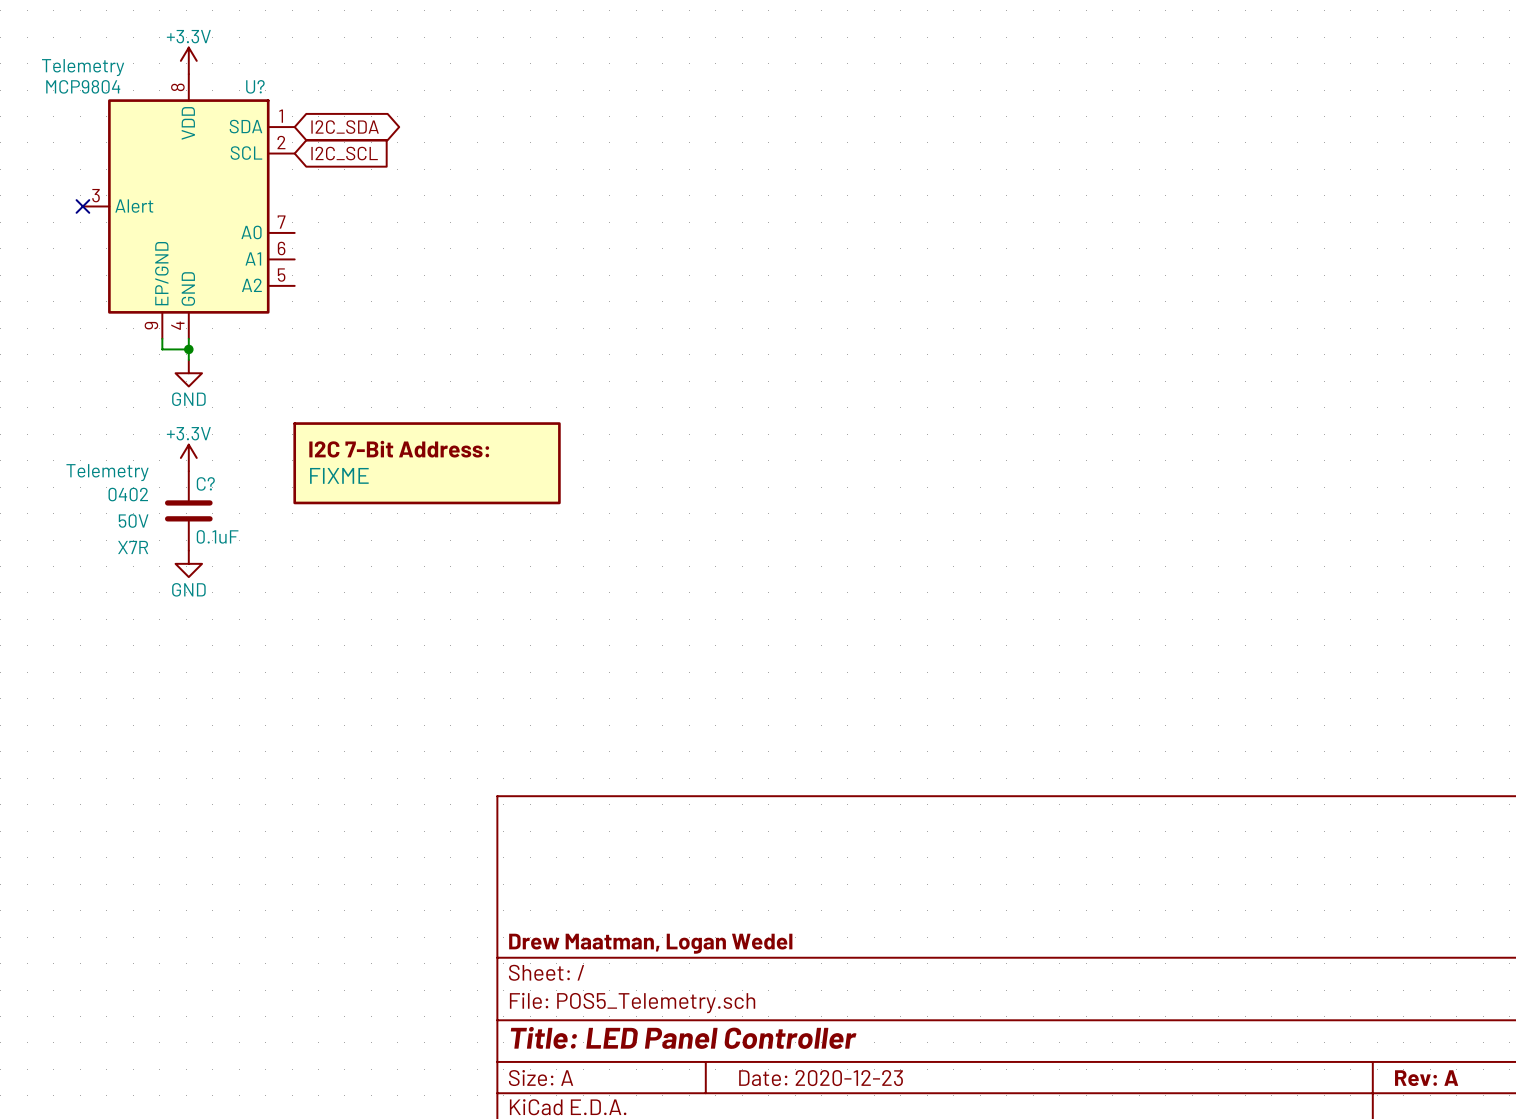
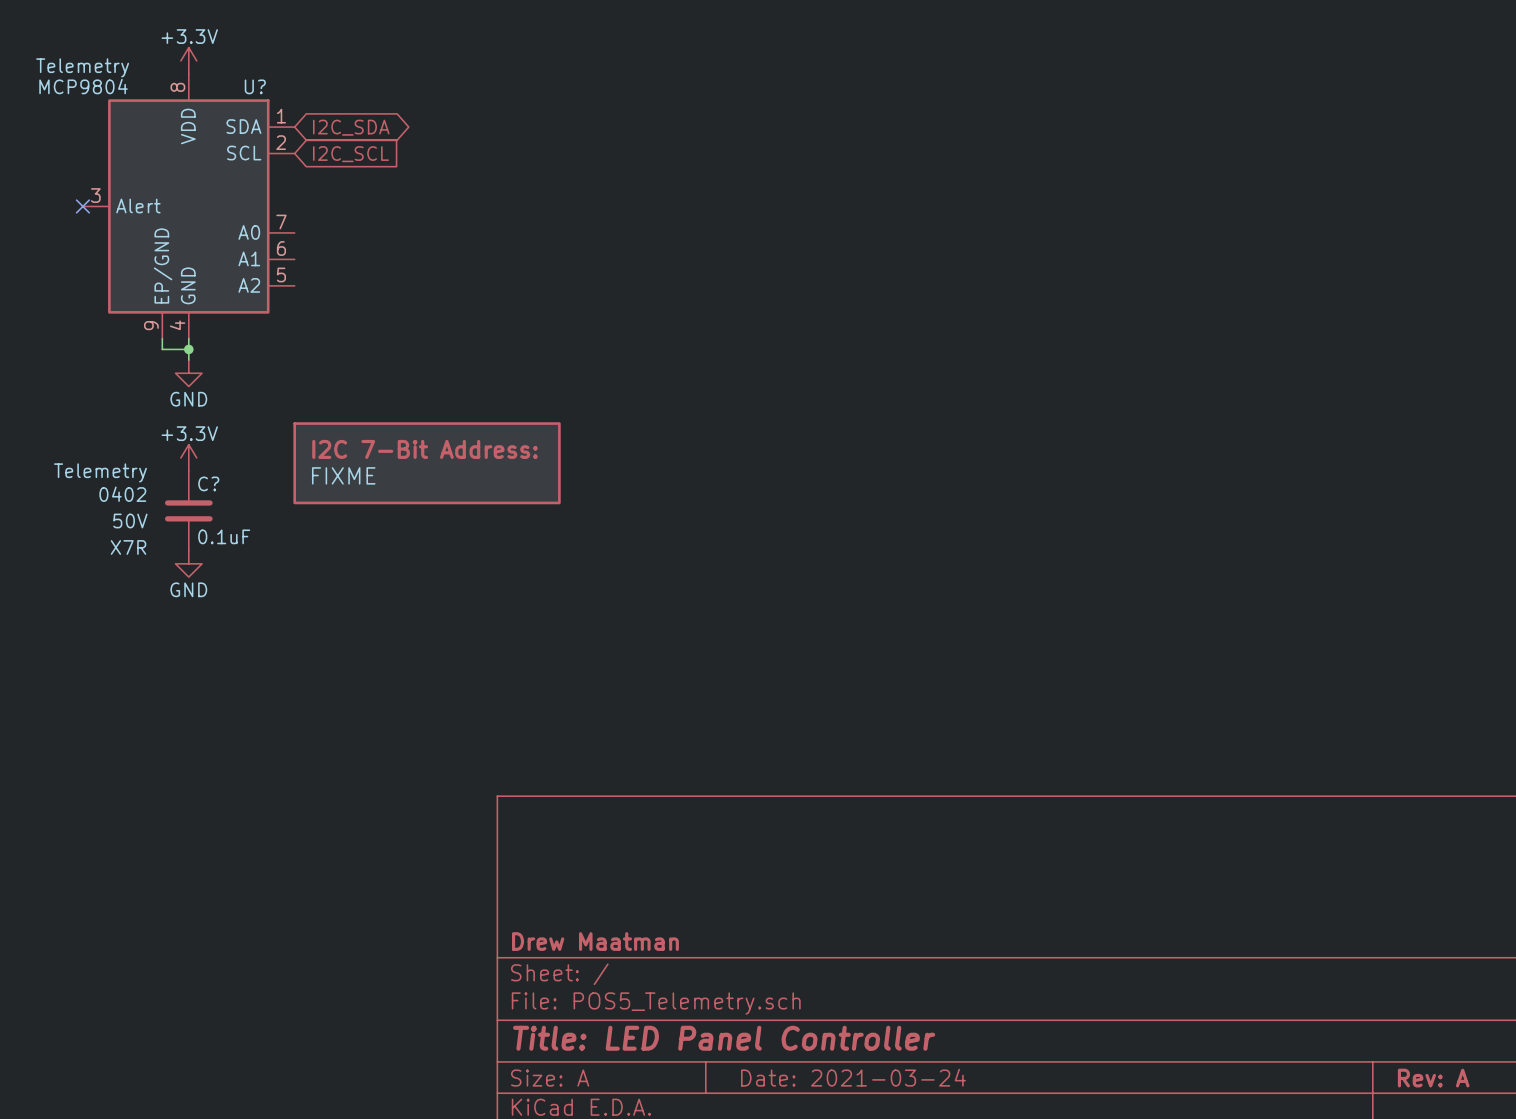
title block: Drew Maatman, Logan Wedel (650, 943) -> Drew Maatman (595, 941)
title block: Date: 2020-12-23 (821, 1078) -> Date: 2021-03-24 (853, 1077)

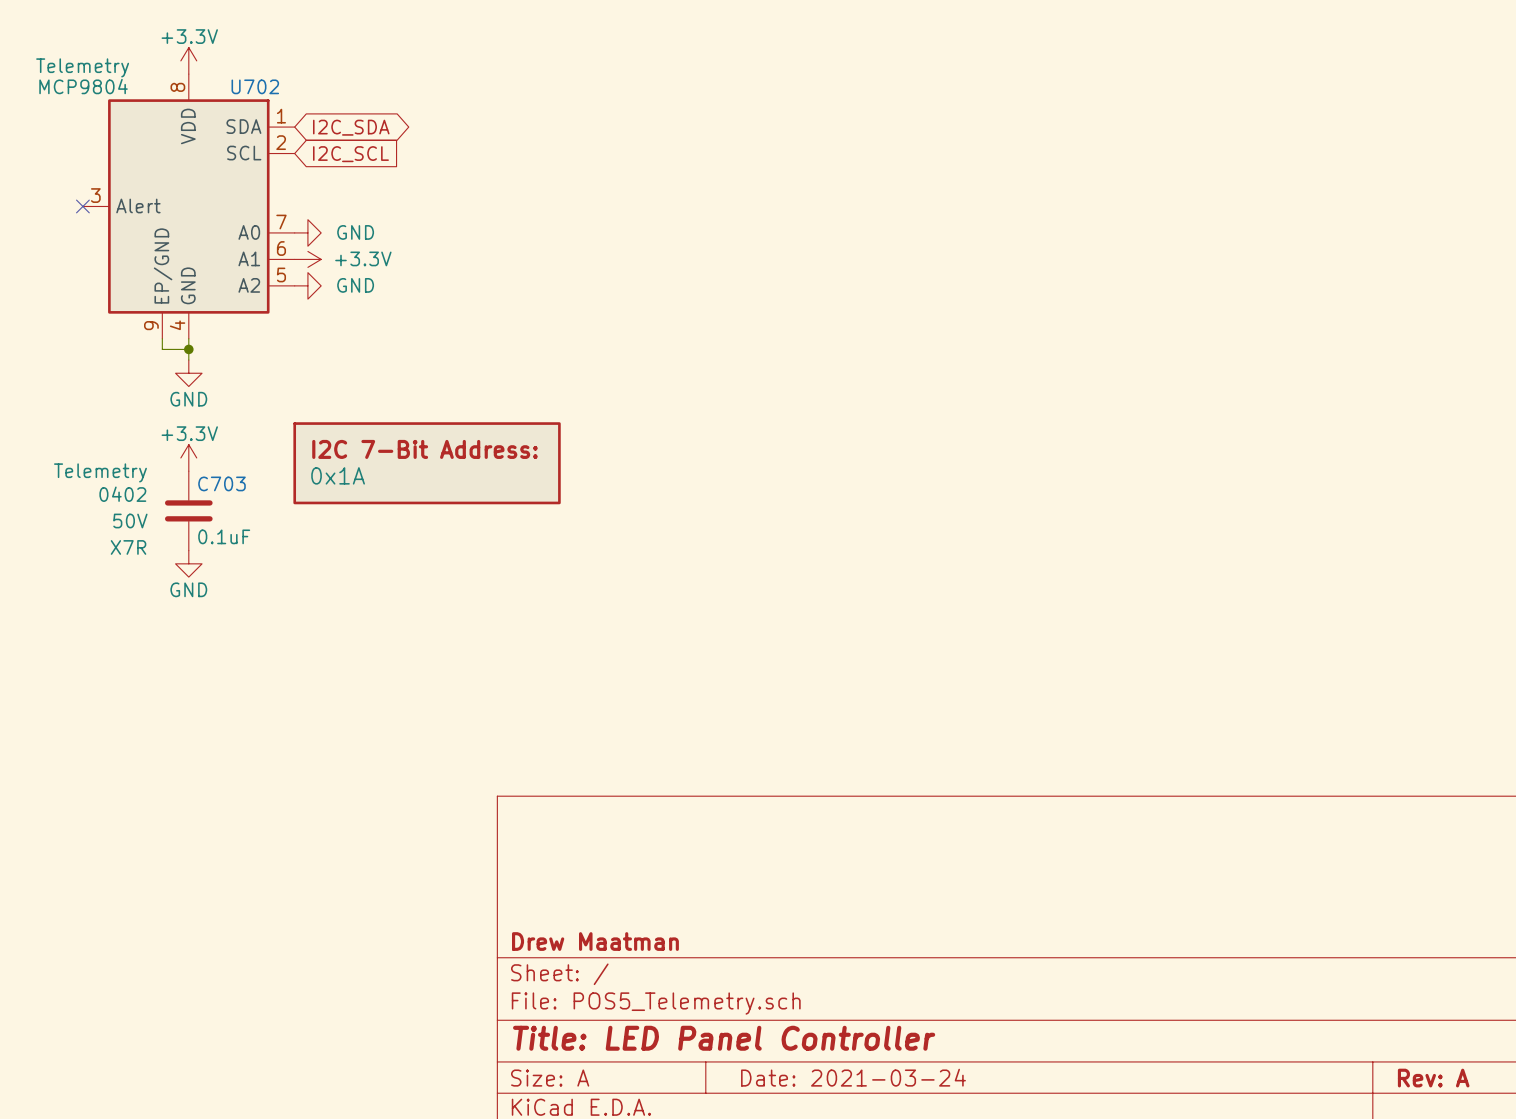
U? name: U? (255, 86) -> U702 (255, 86)
power symbol: none -> GND (307, 232)
power symbol: none -> +3.3V (307, 259)
power symbol: none -> GND (307, 285)
part value: FIXME (343, 475) -> 0x1A (338, 475)
C? name: C? (208, 483) -> C703 (221, 483)

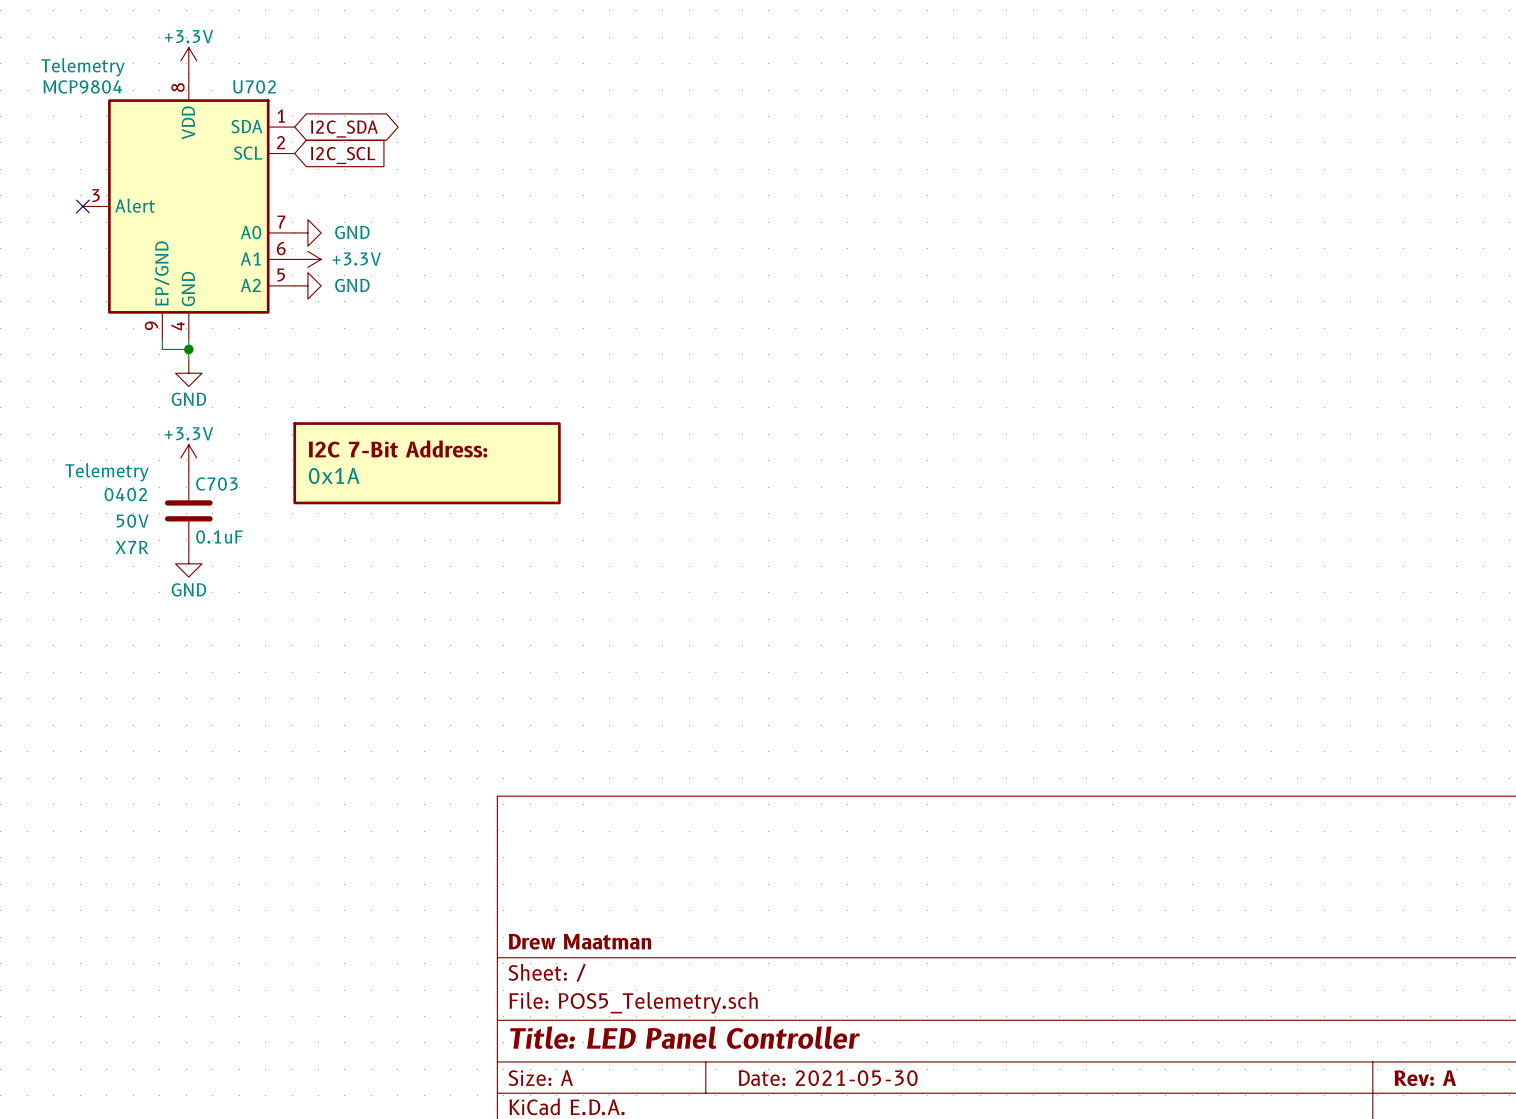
title block: Date: 2021-03-24 (853, 1077) -> Date: 2021-05-30 (828, 1078)

